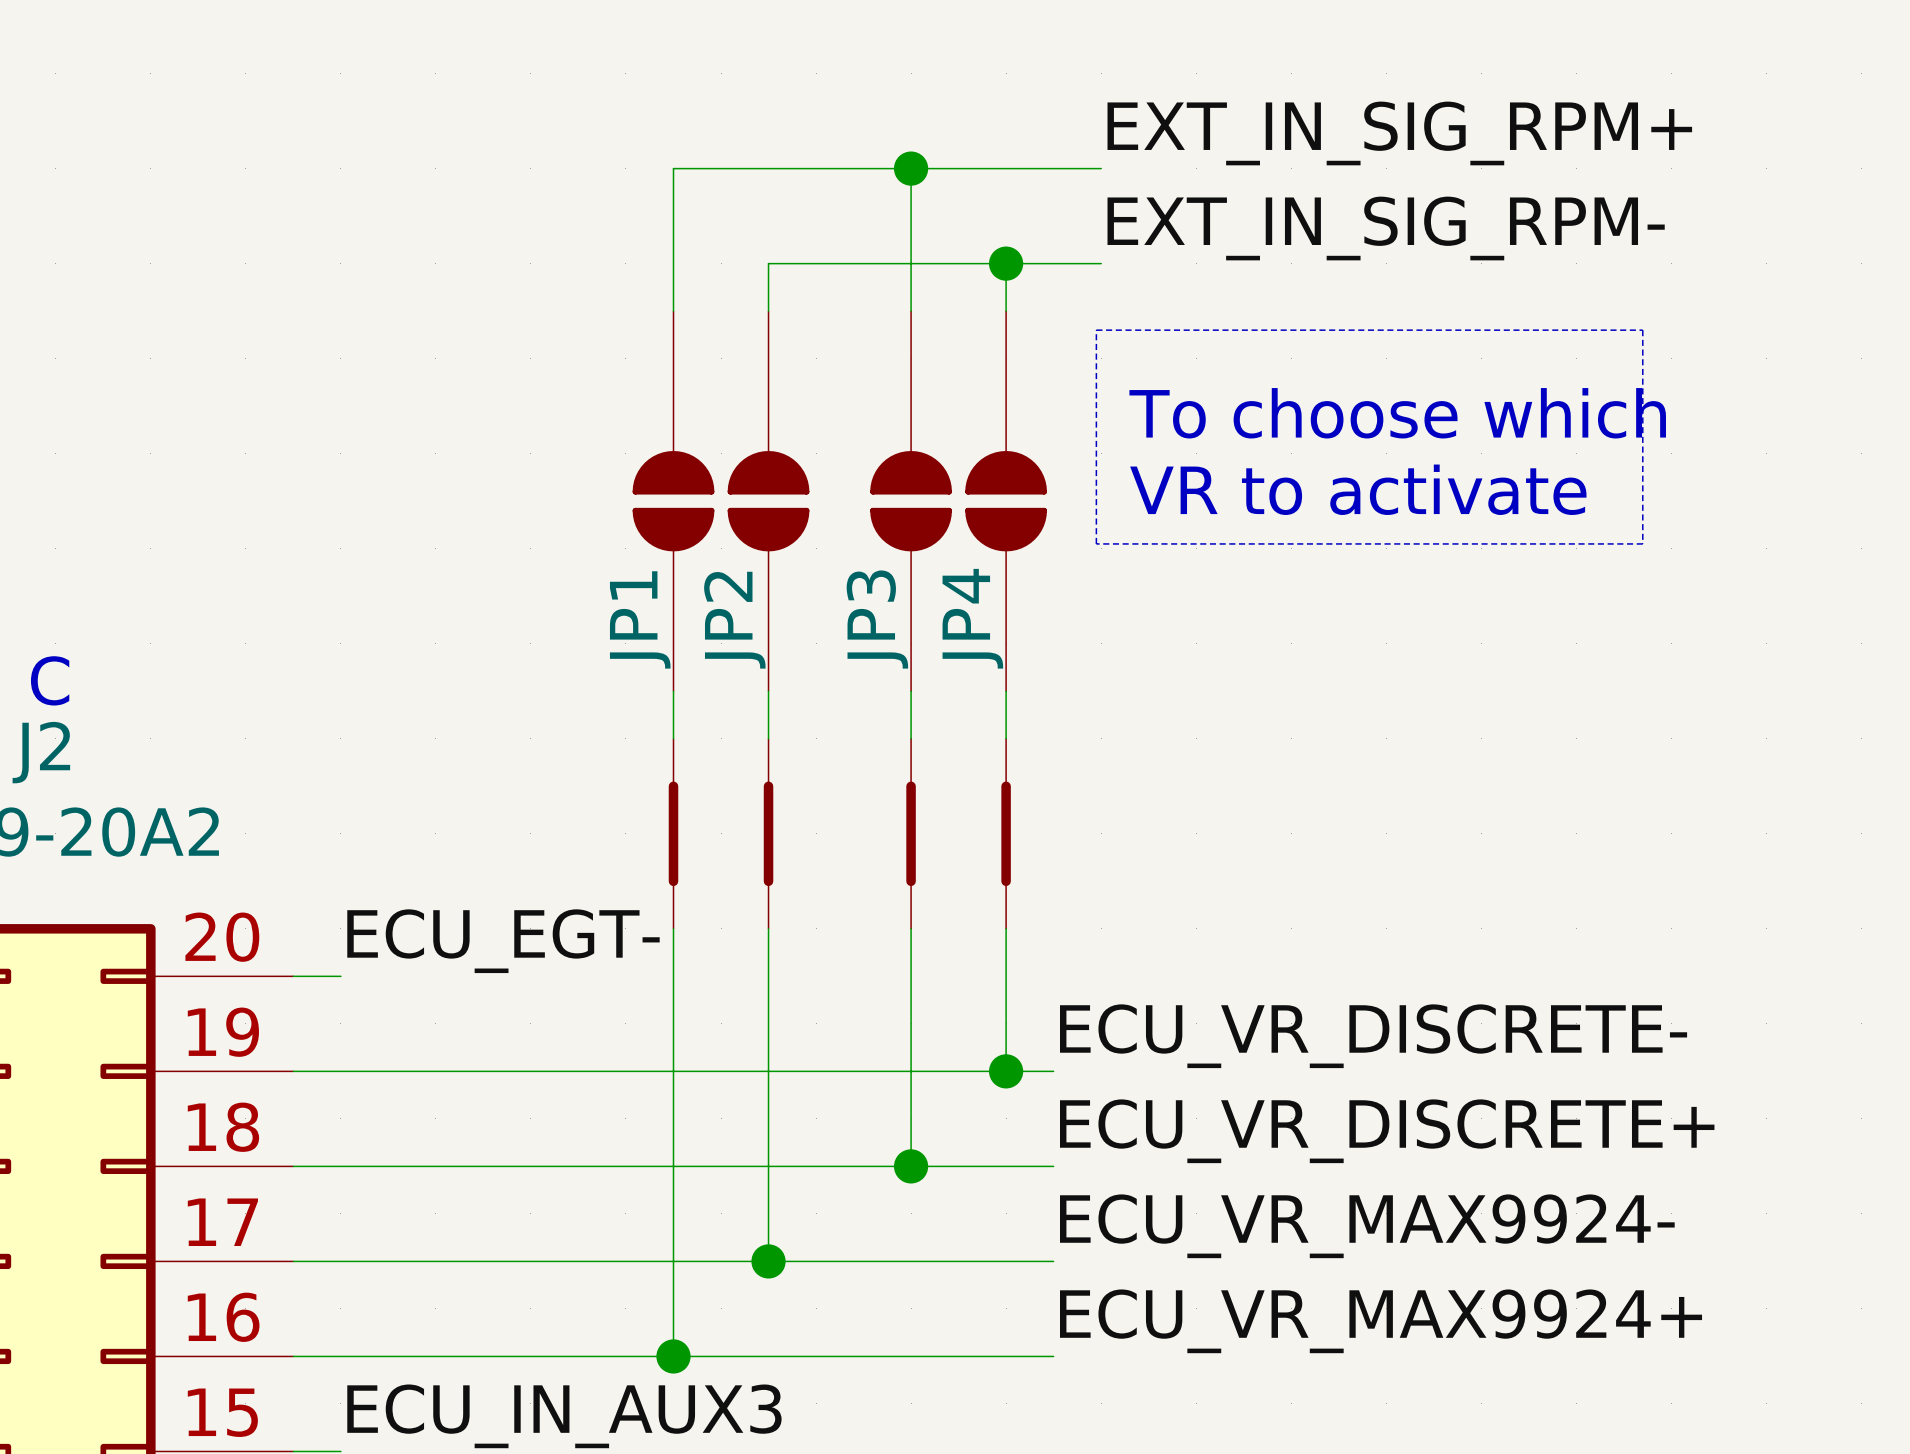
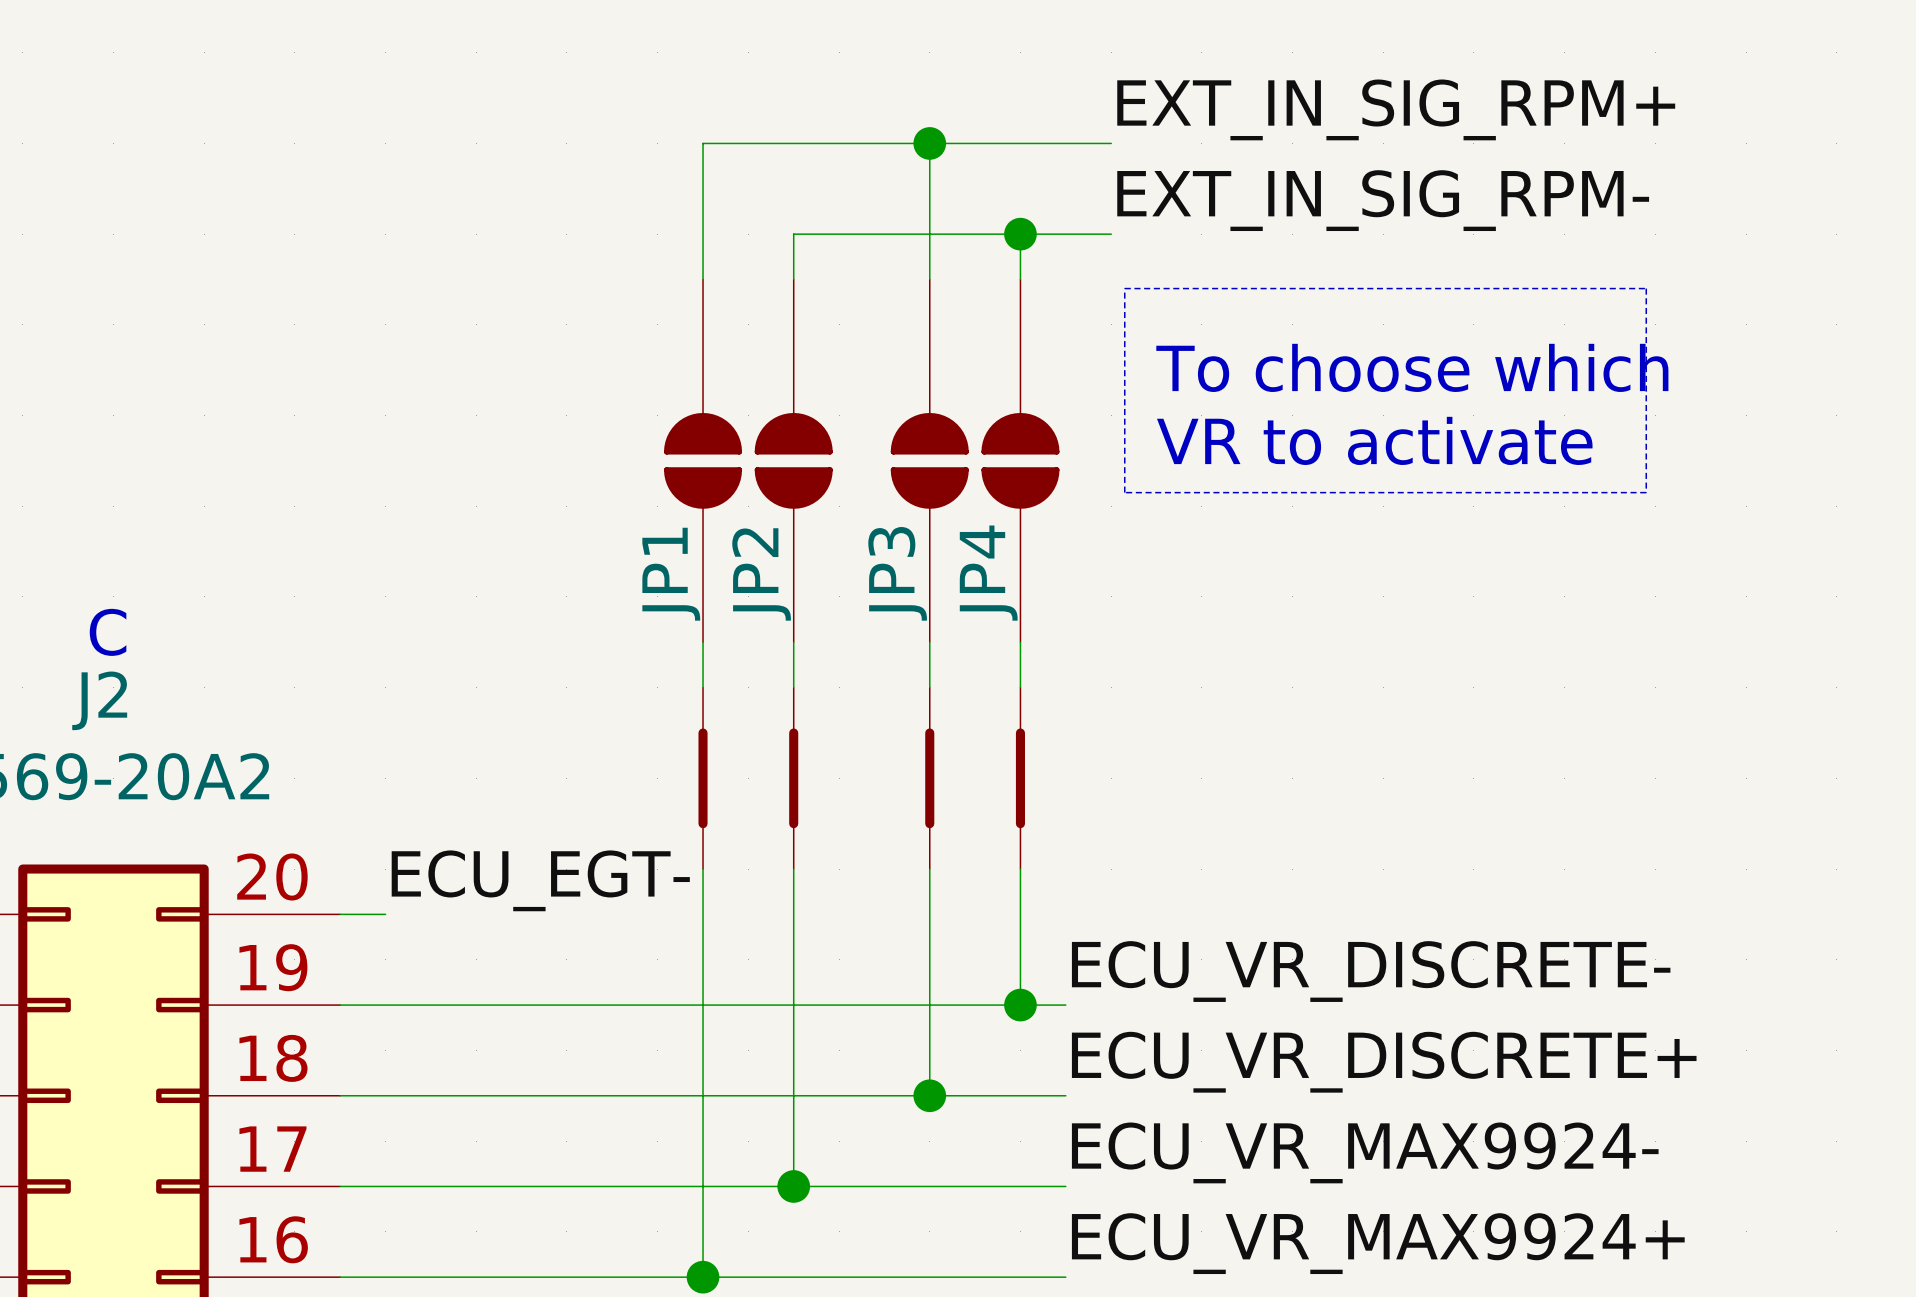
line: (1096, 330) (1642, 330) (1642, 543) (1096, 543) (1096, 330) -> (1124, 288) (1646, 288) (1646, 492) (1124, 492) (1124, 288)
text position: To choose which (1397, 413) -> To choose which (1412, 367)
text position: VR to activate (1358, 489) -> VR to activate (1374, 440)

